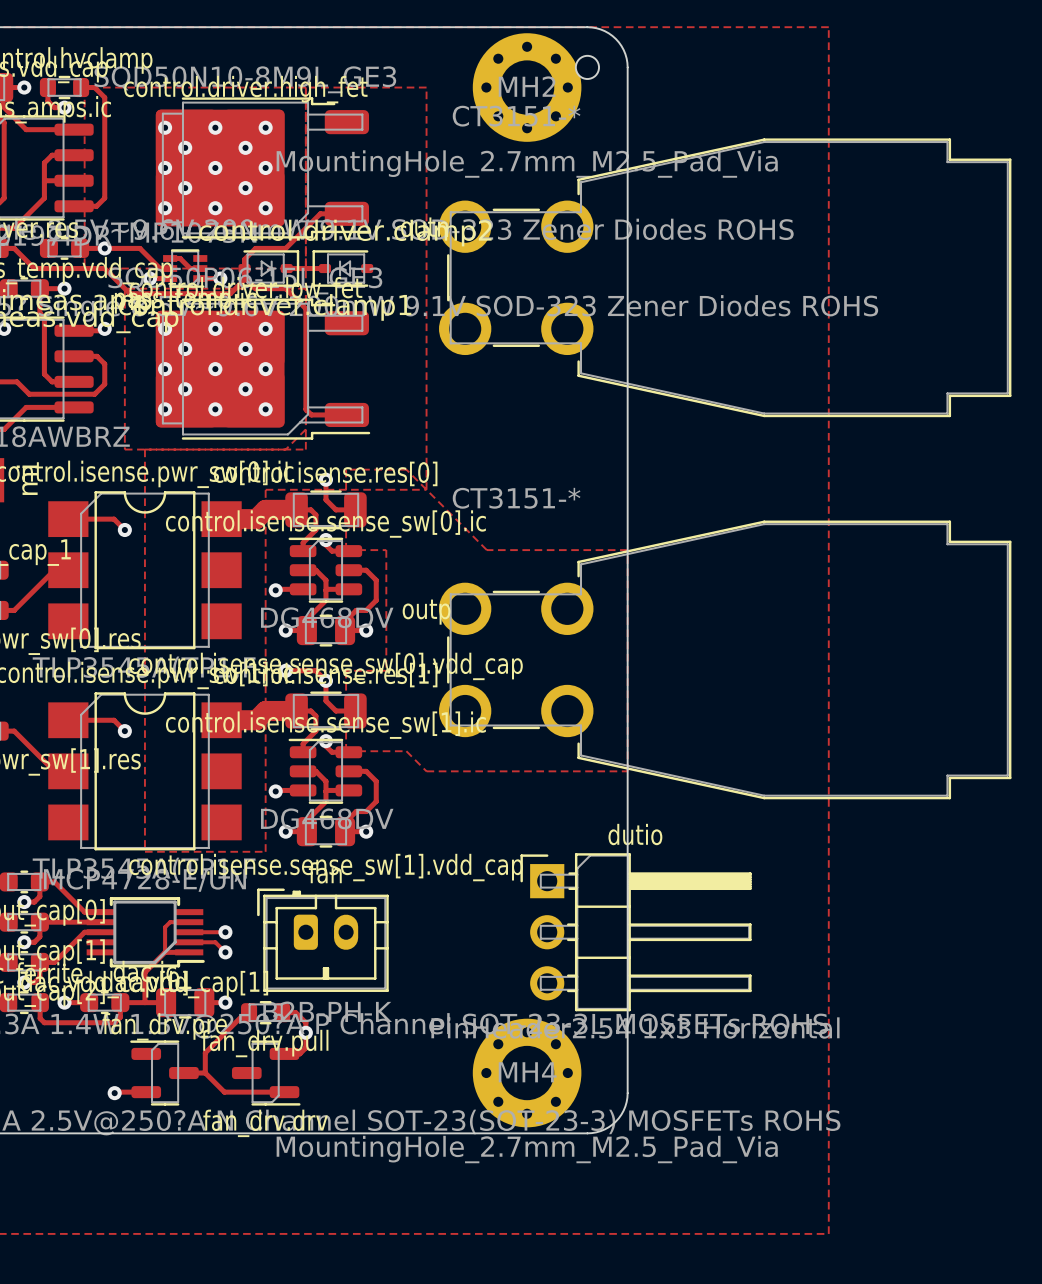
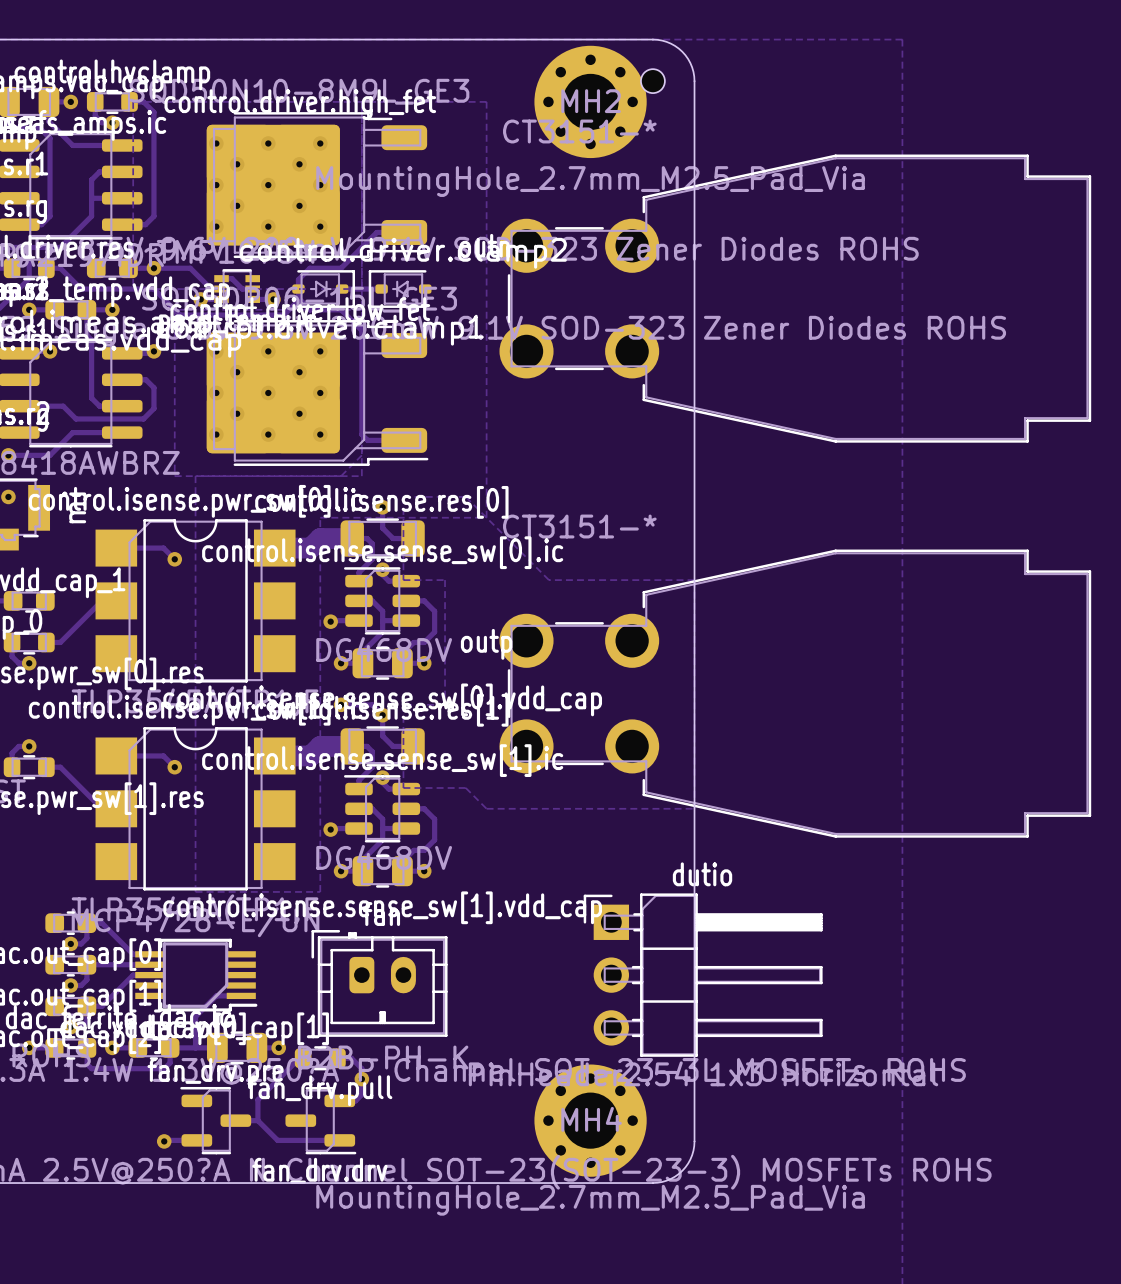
track: (189, 922) (170, 922) (165, 927) (165, 952) -> none
track: (189, 932) (225, 932) -> none
via: (225, 932) -> none
track: (189, 942) (215, 942) (225, 952) -> none
via: (225, 952) -> none

